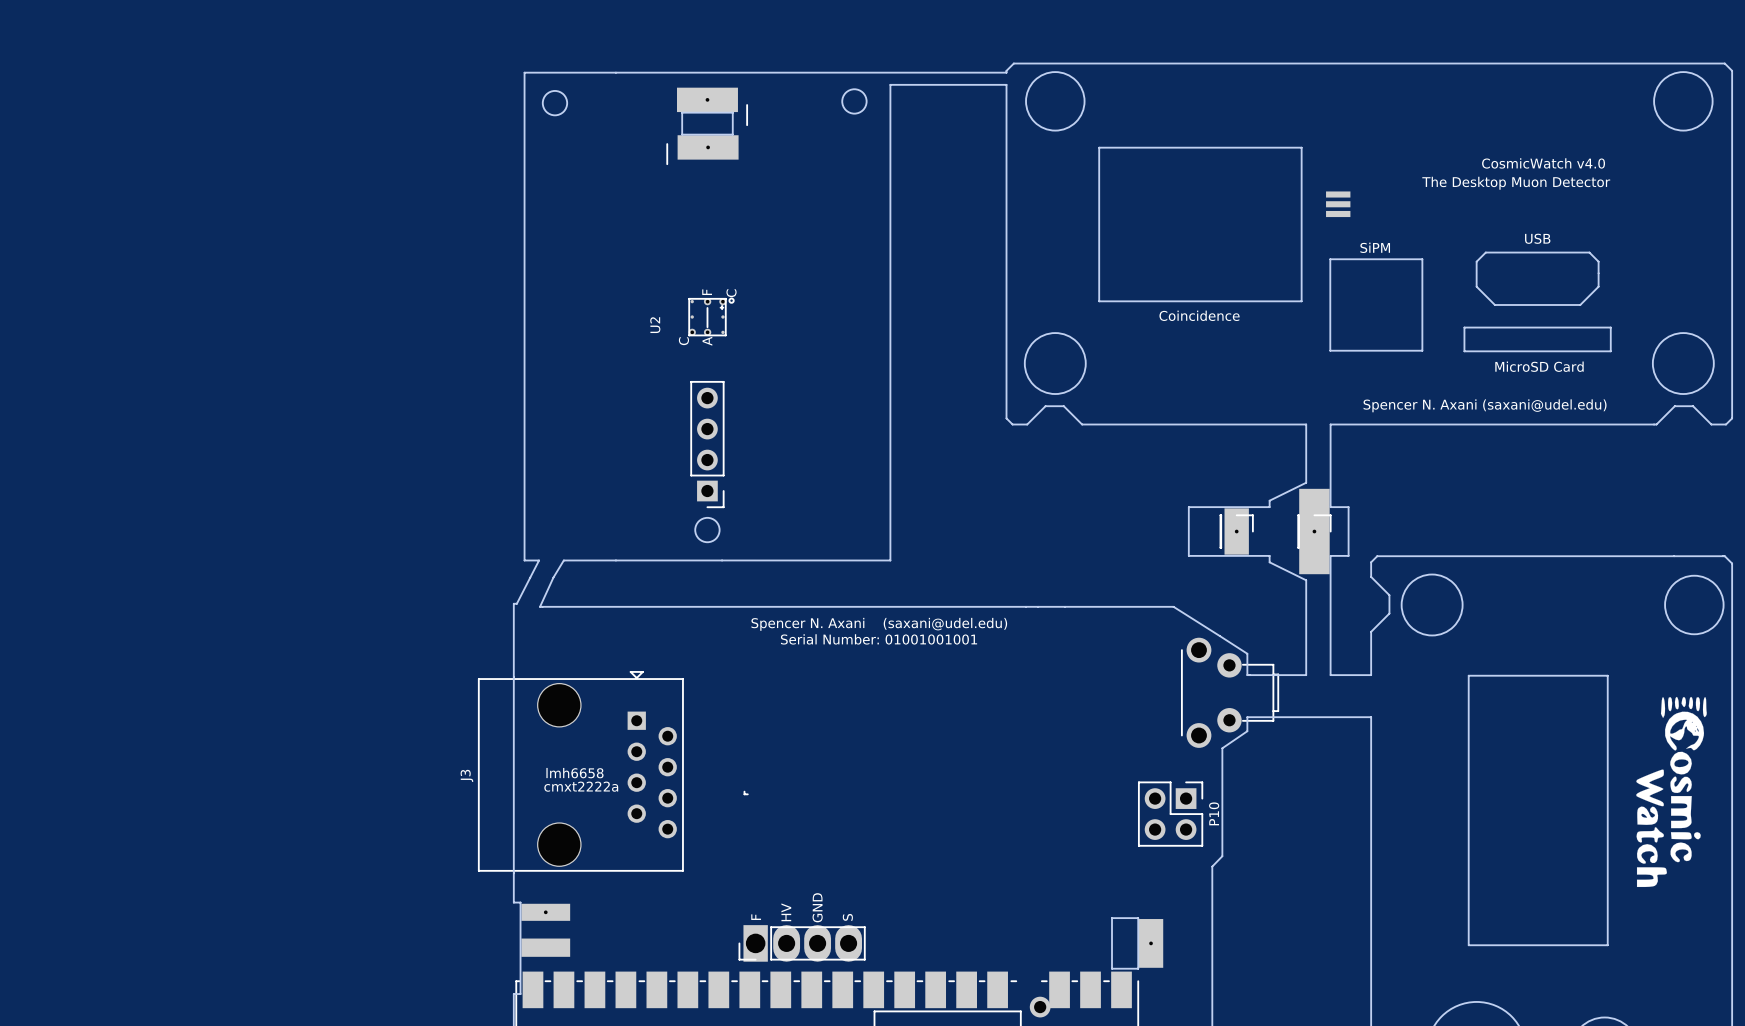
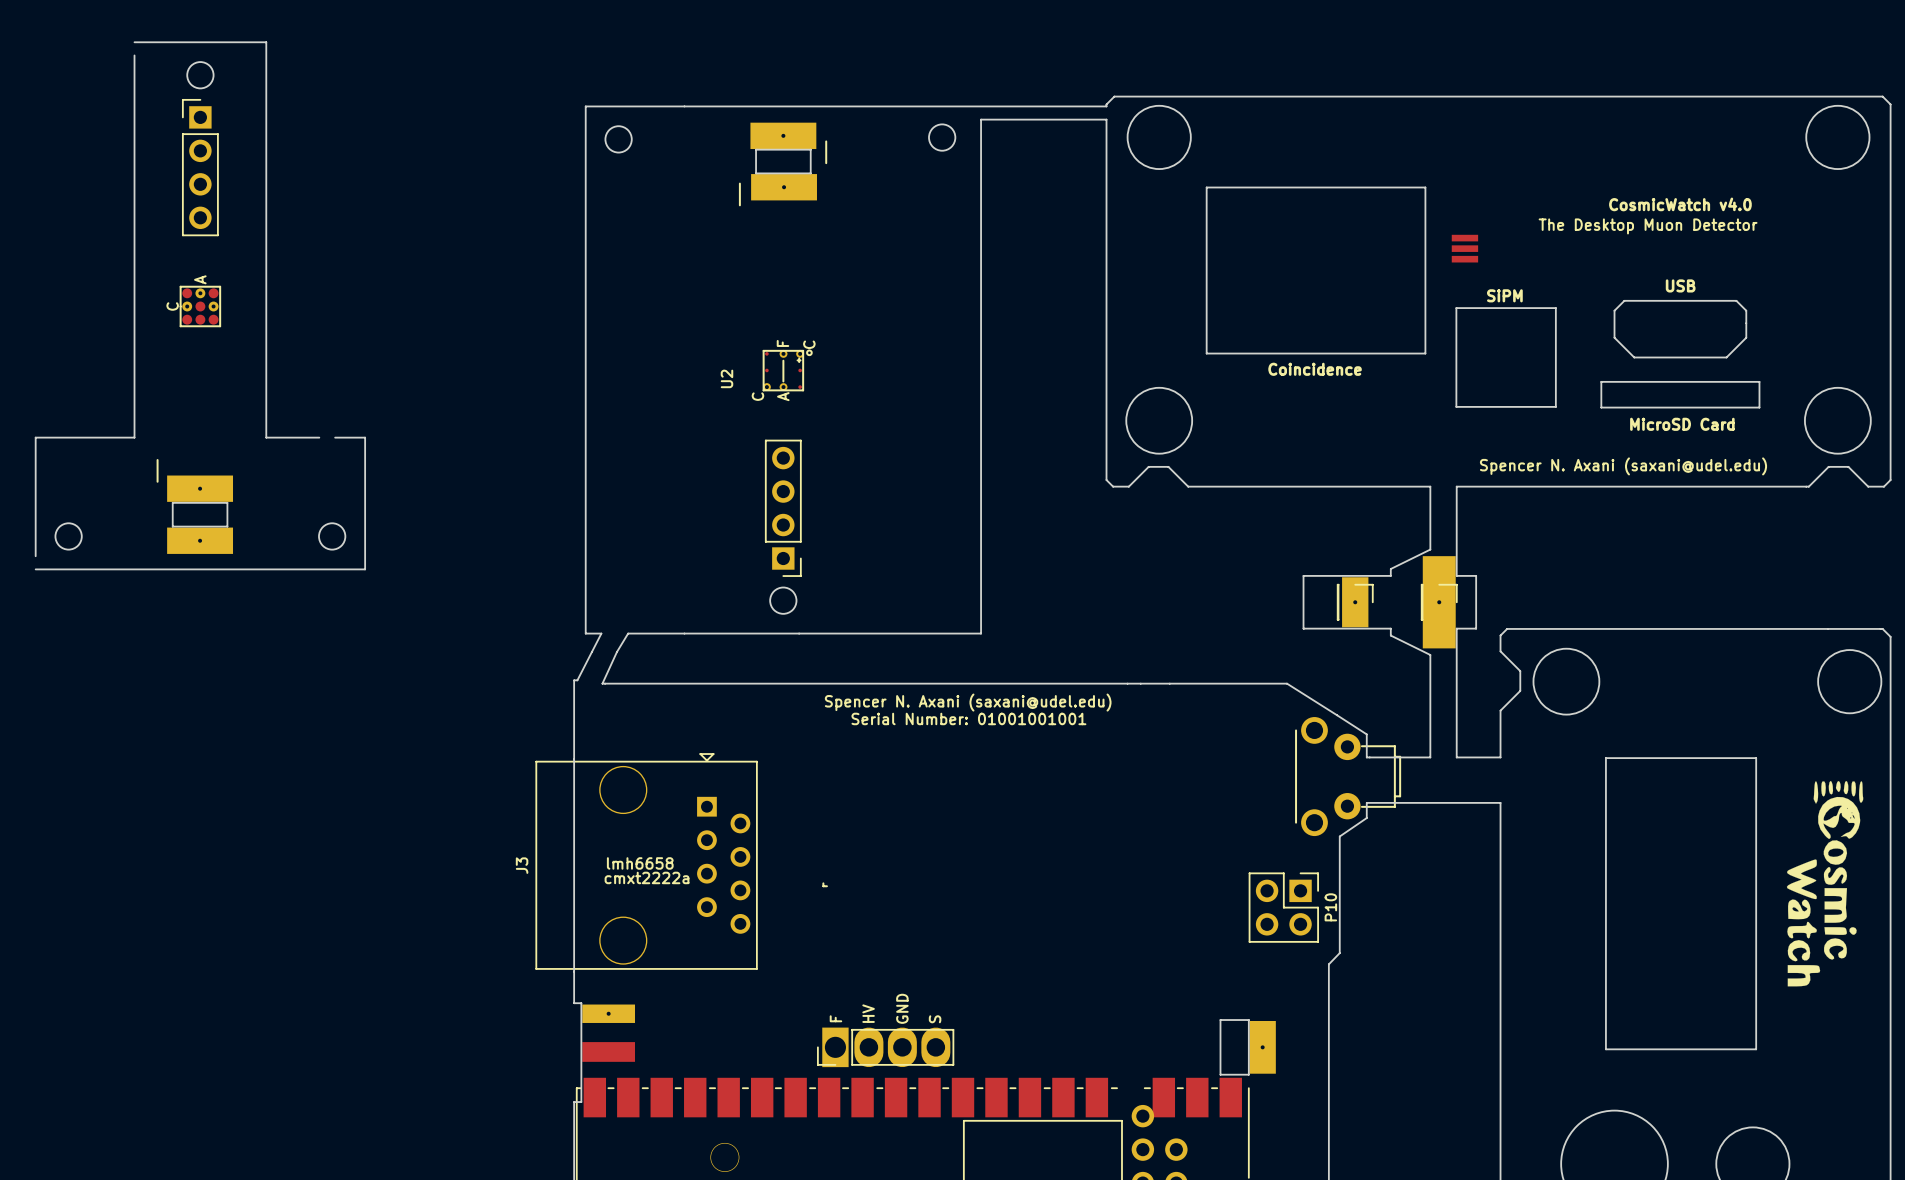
board edge: none -> (134, 42) (266, 42) (266, 437) (319, 437)
board edge: none -> (134, 55) (134, 437) (35, 437) (35, 556)
round board edge: none -> [186, 61, 215, 90]
part: none -> (200, 167)
part: none -> (200, 306)
board edge: none -> (335, 437) (365, 437) (365, 569) (35, 569)
line: none -> (157, 460) (157, 481)
part: none -> (200, 488)
board edge: none -> (172, 502) (172, 526) (227, 526) (227, 502) (172, 502)
round board edge: none -> [54, 522, 83, 551]
round board edge: none -> [318, 522, 347, 551]
part: none -> (200, 540)

